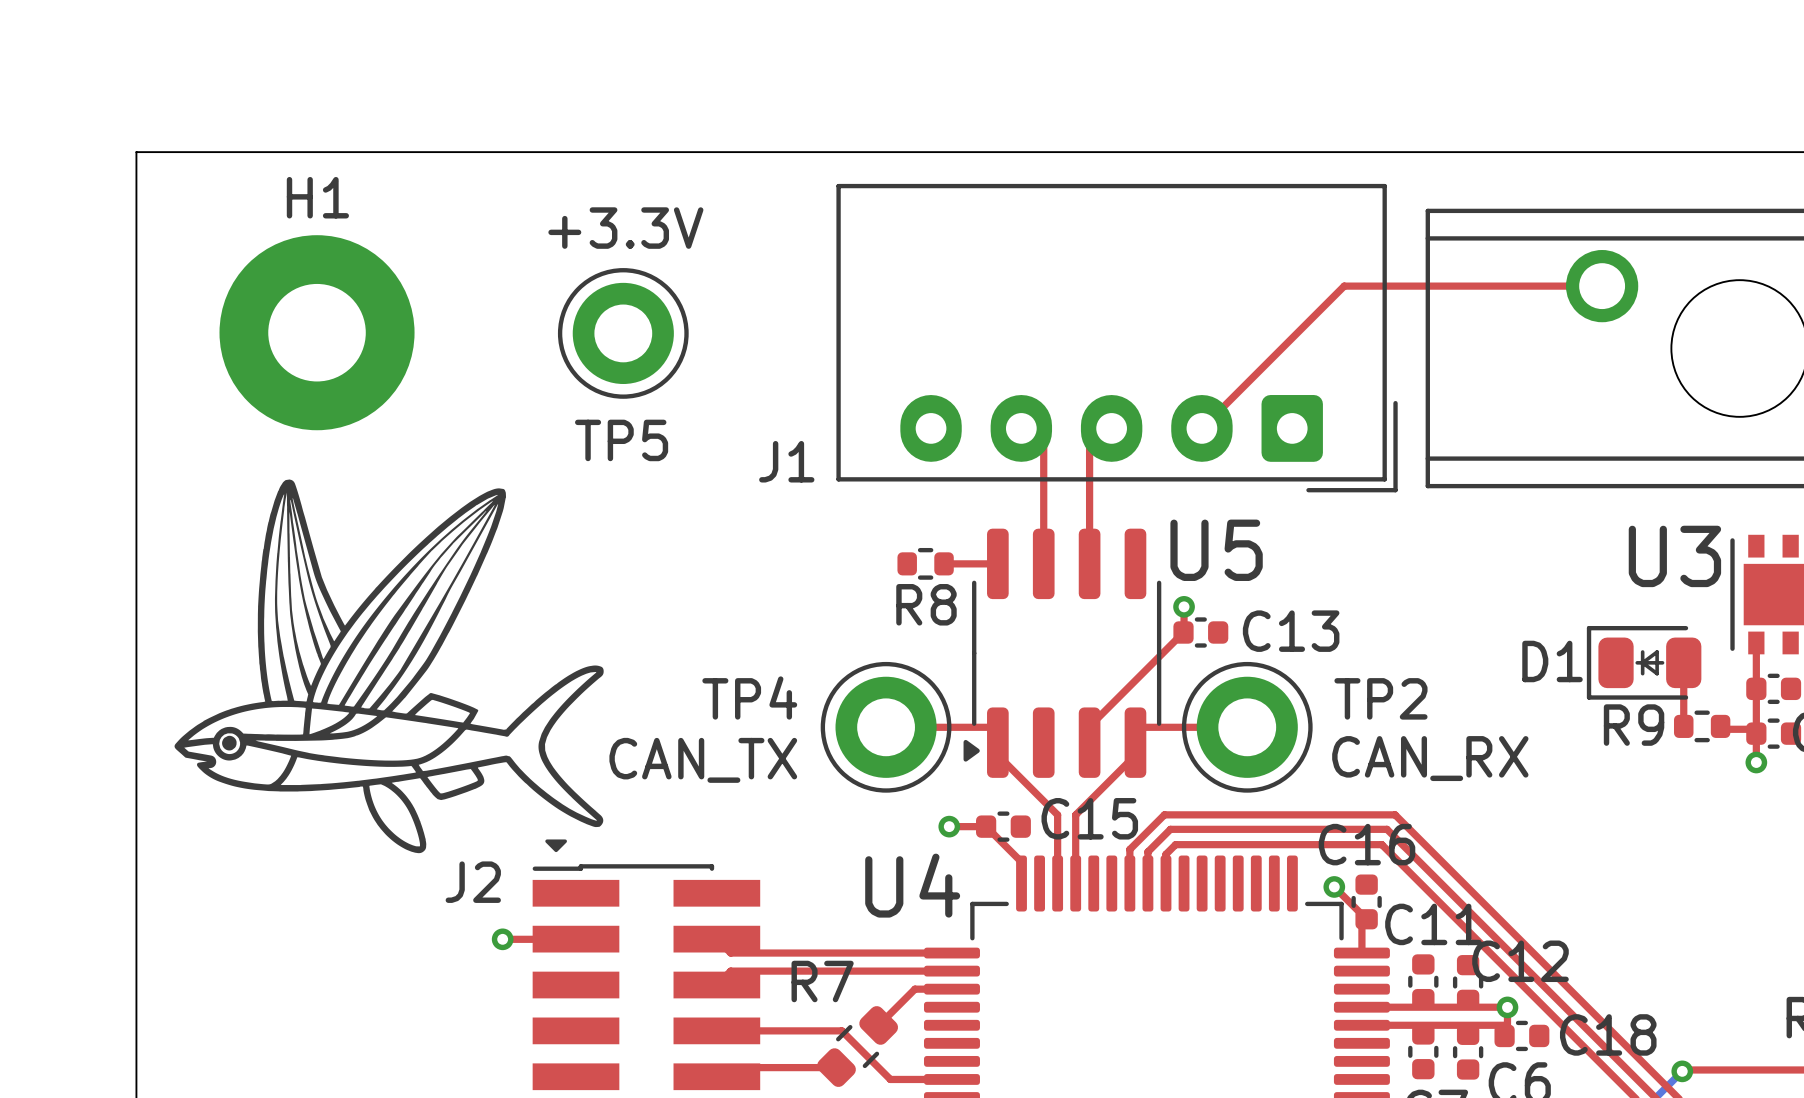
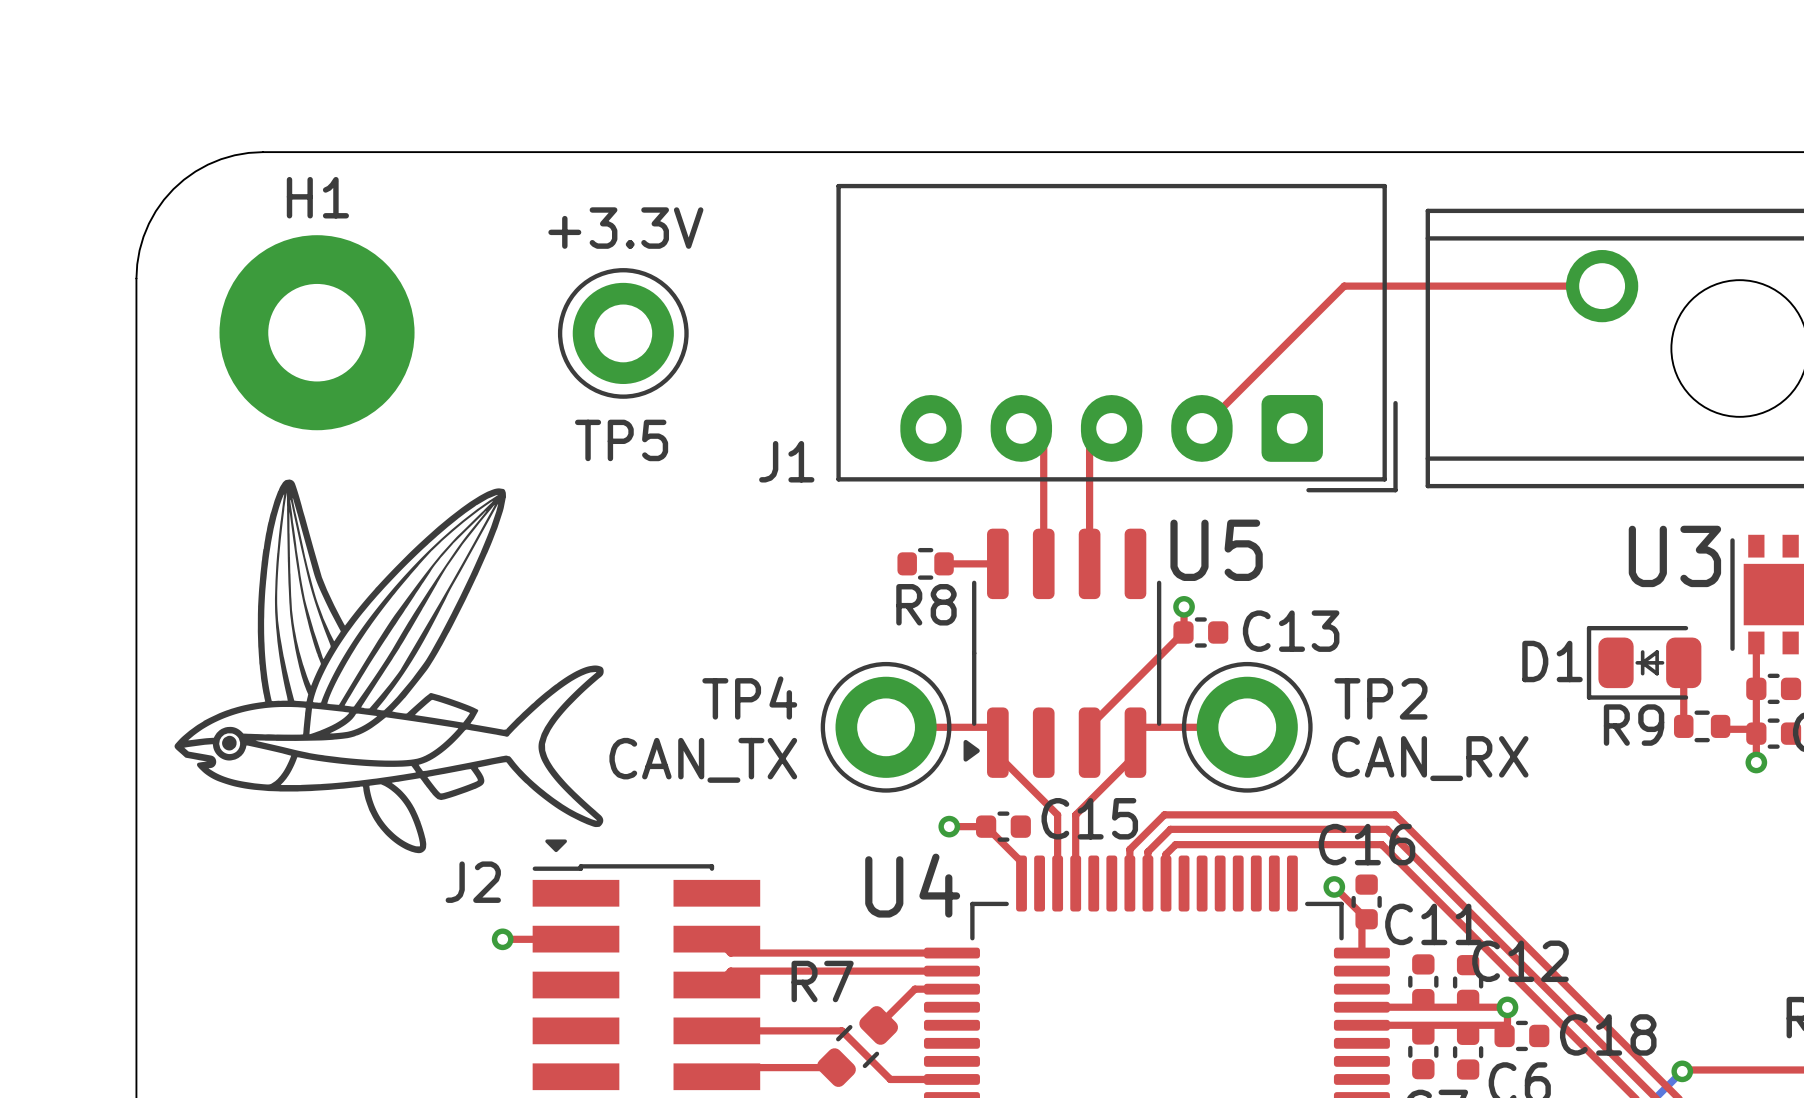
board edge: (262, 152) (136, 152) (136, 278) -> (262, 152) (248, 152) (221, 159) (195, 171) (173, 189) (155, 211) (143, 236) (139, 250) (136, 278)

